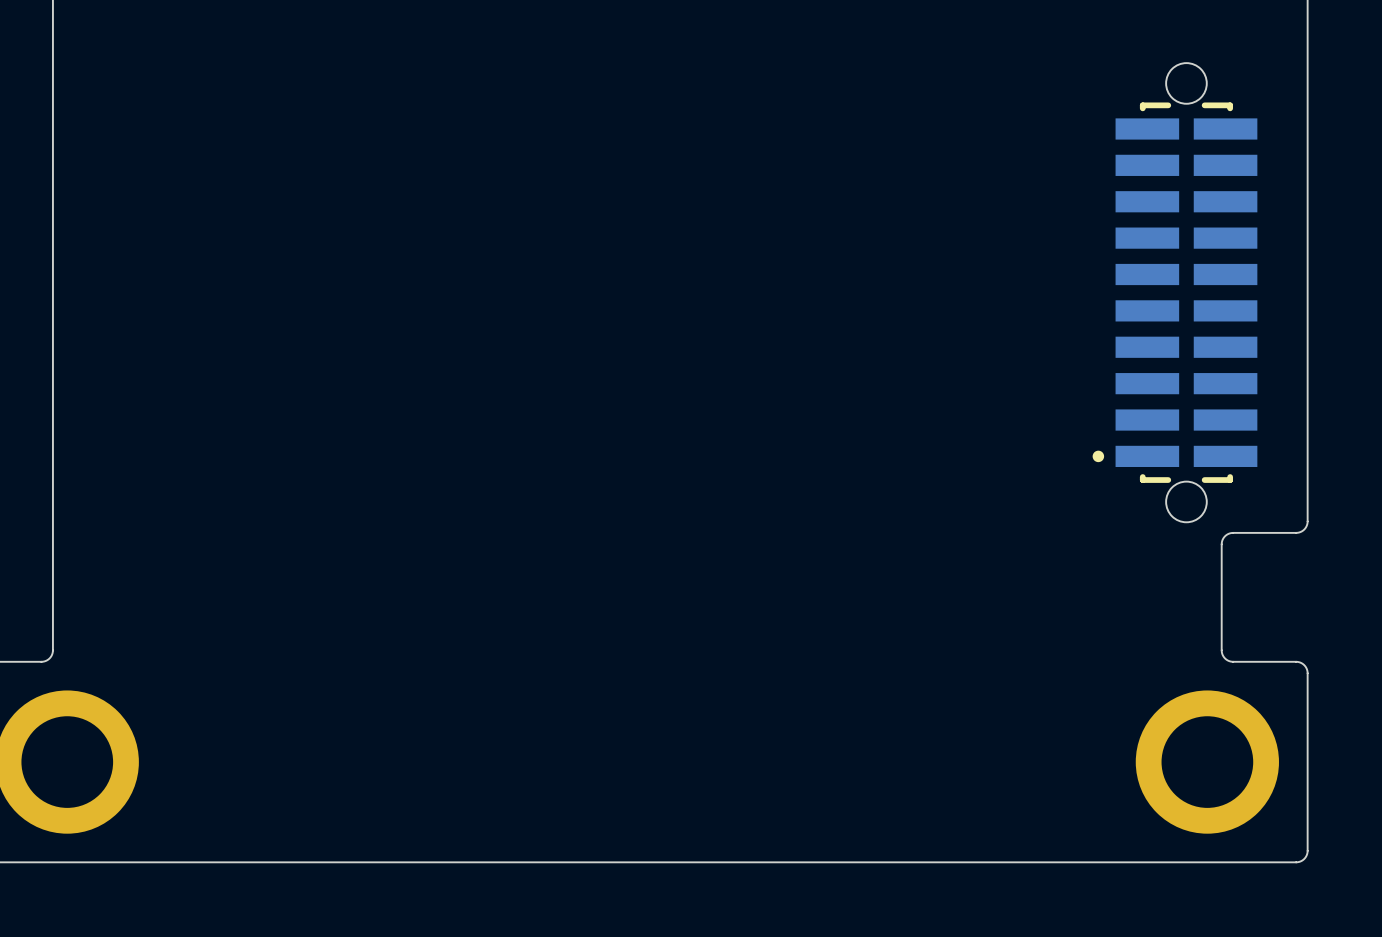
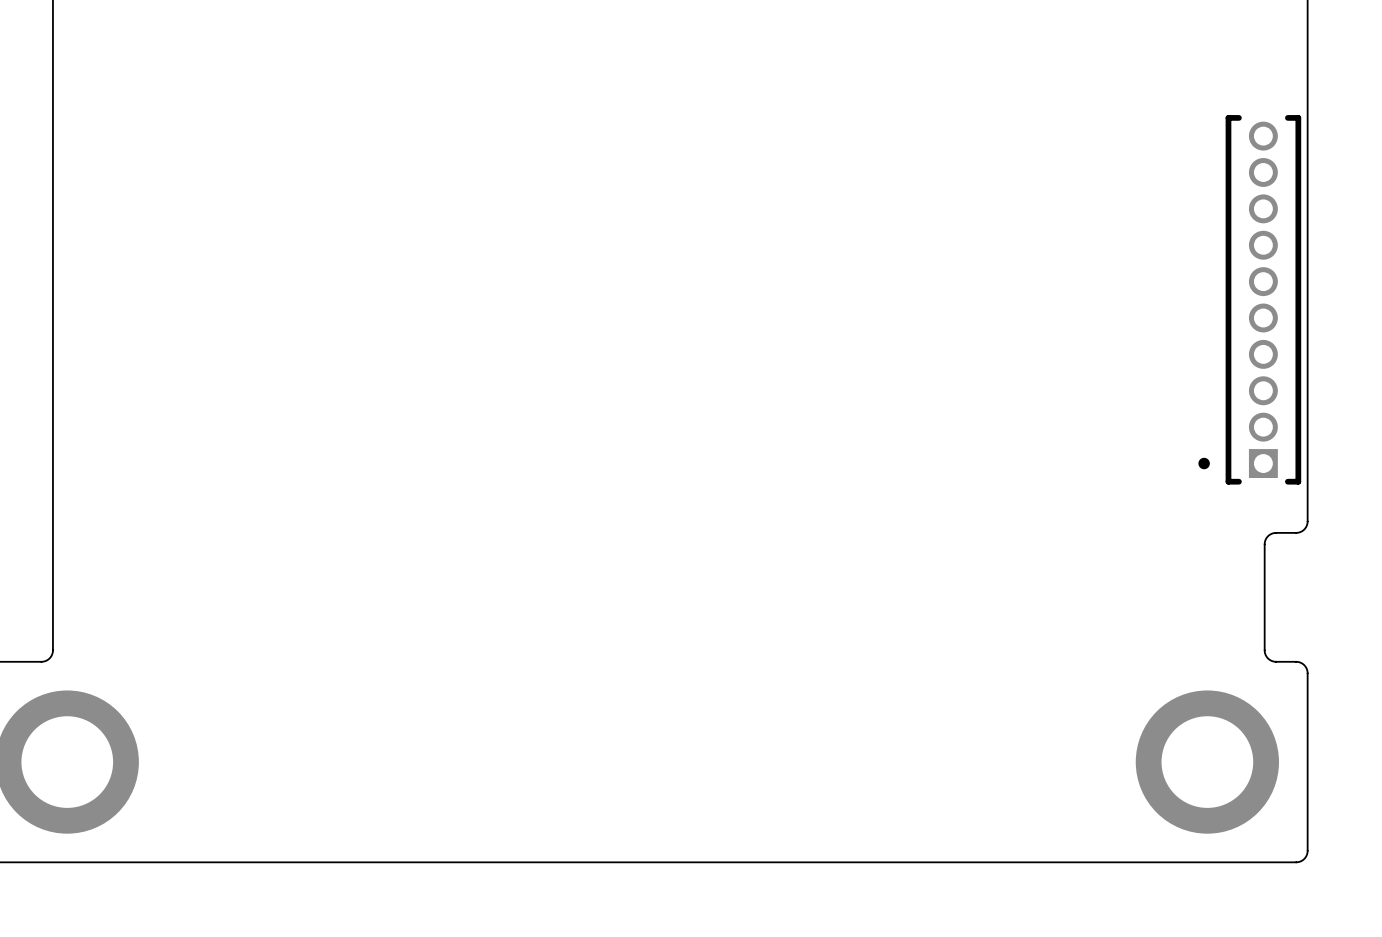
part: (1175, 292) -> none
part: none -> (1249, 299)
board edge: (1276, 532) (1231, 532) (1222, 539) (1221, 650) (1224, 657) (1230, 661) (1276, 661) -> (1276, 532) (1268, 536) (1264, 543) (1264, 650) (1268, 658) (1276, 661)

